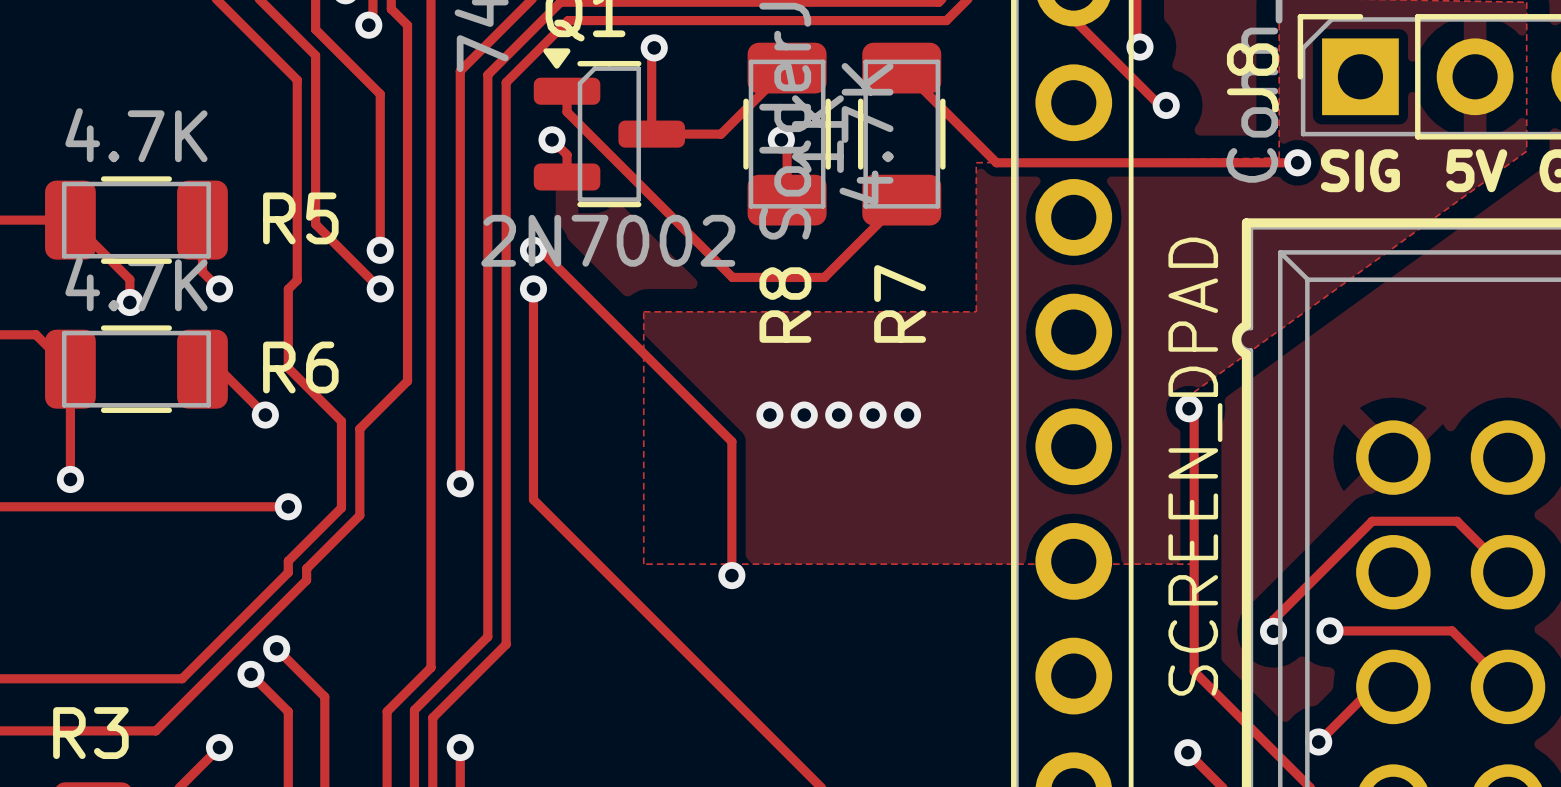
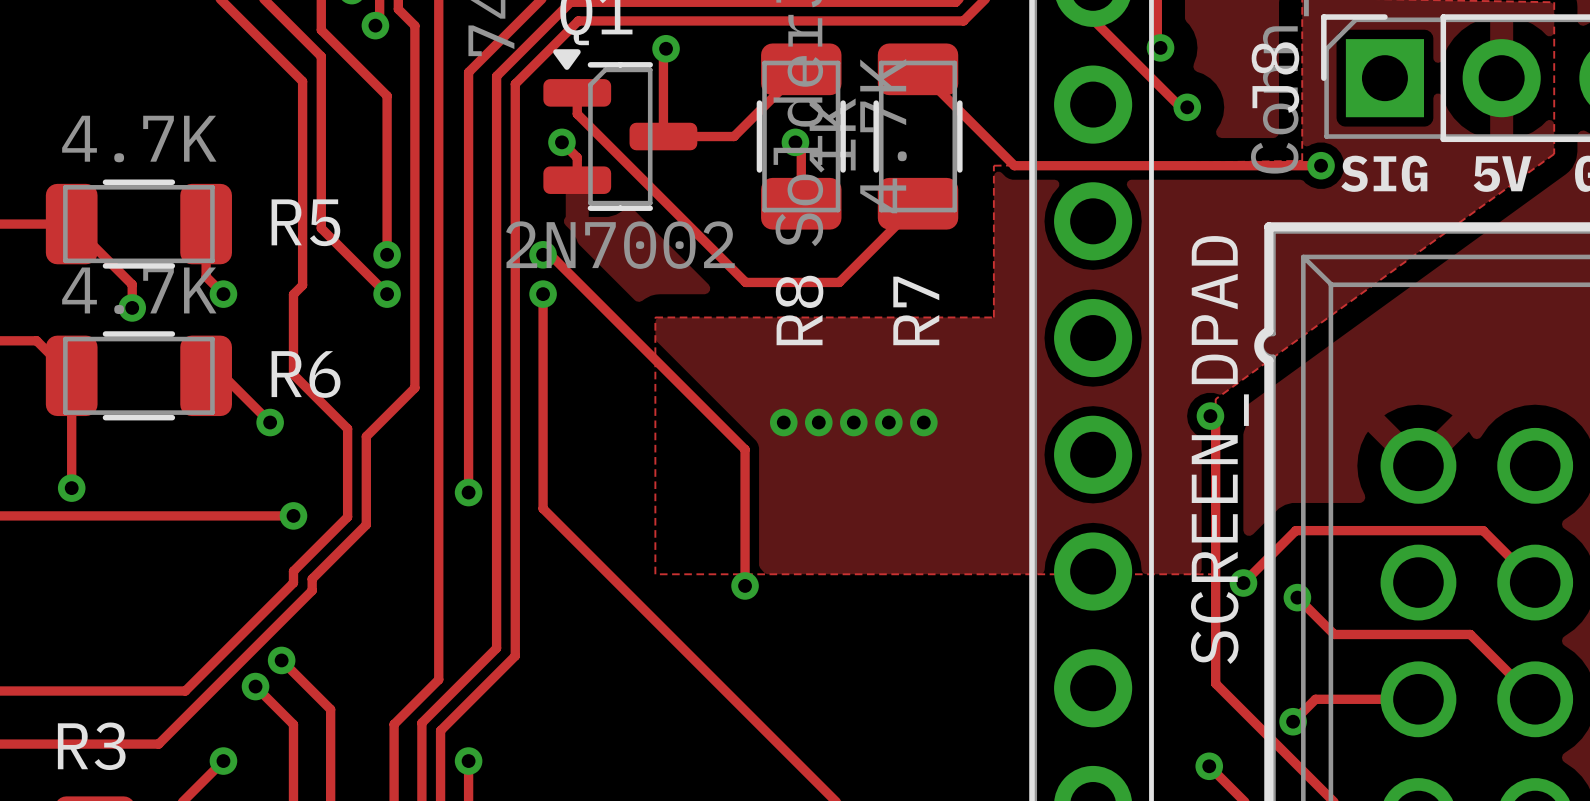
track: (1372, 521) (1273, 619) (1273, 631) -> (1396, 530) (1295, 530) (1243, 583)
via: none -> (1243, 583)
via: none -> (1297, 597)
track: (1329, 630) (1452, 630) -> (1297, 597) (1334, 634) (1470, 634) (1478, 642)
via: (1329, 630) -> none
via: (1273, 631) -> none
track: (1373, 686) (1318, 741) -> (1398, 699) (1315, 699) (1293, 721)
via: none -> (1293, 721)
via: (1318, 741) -> none

